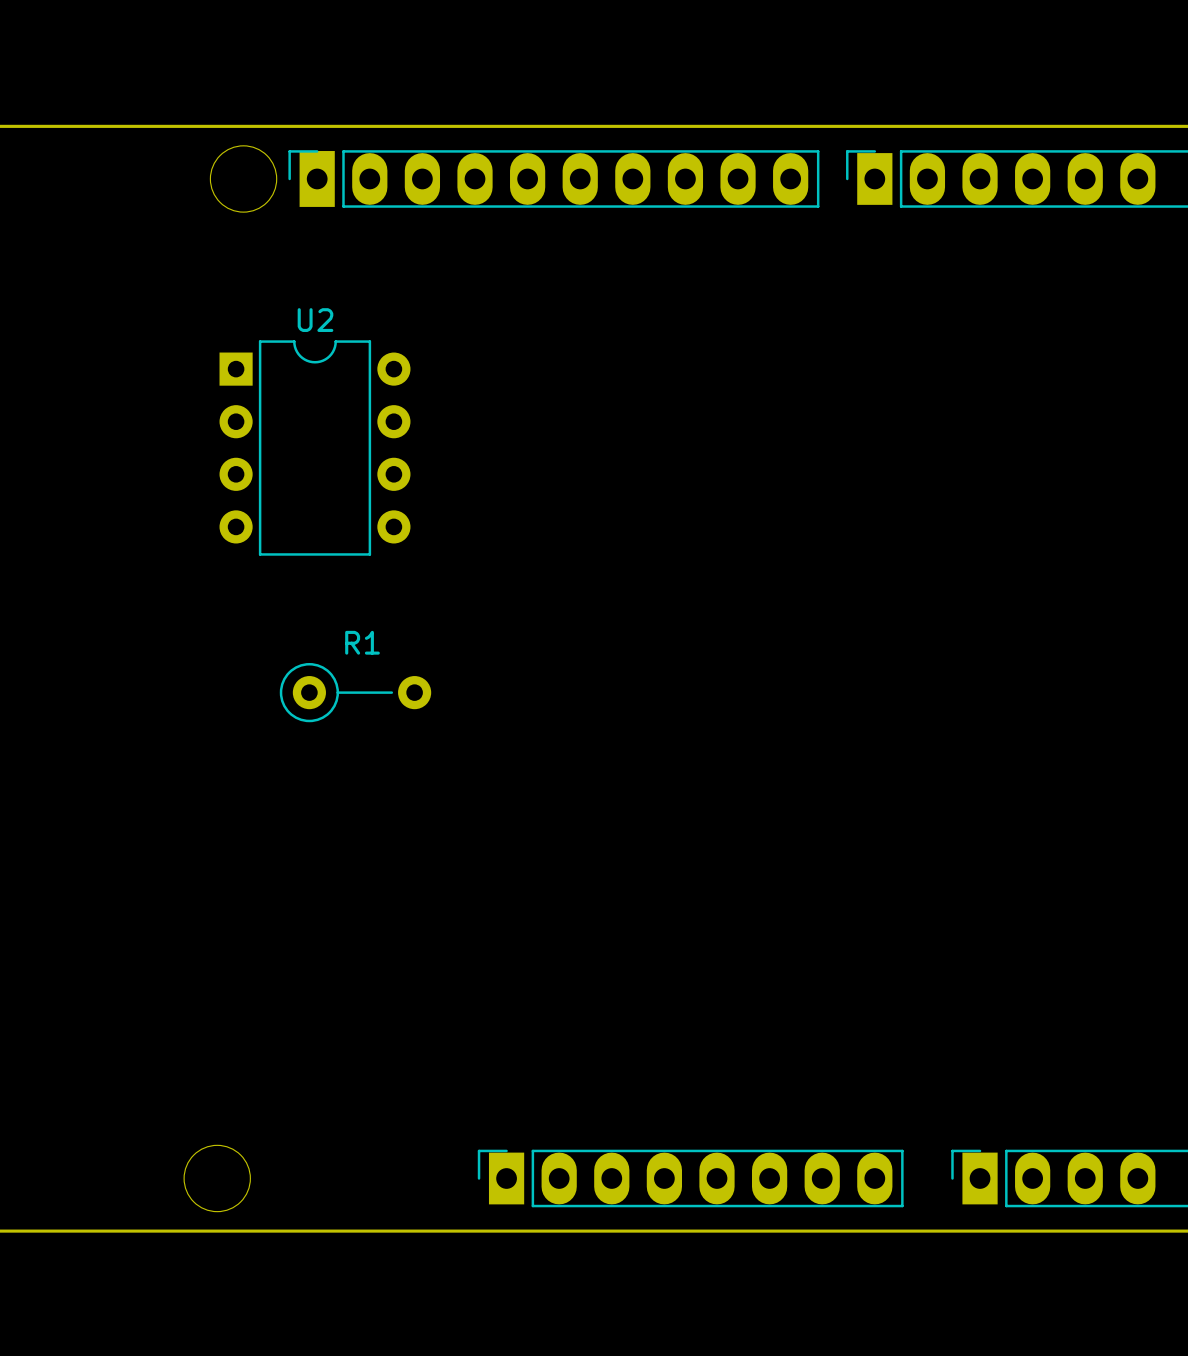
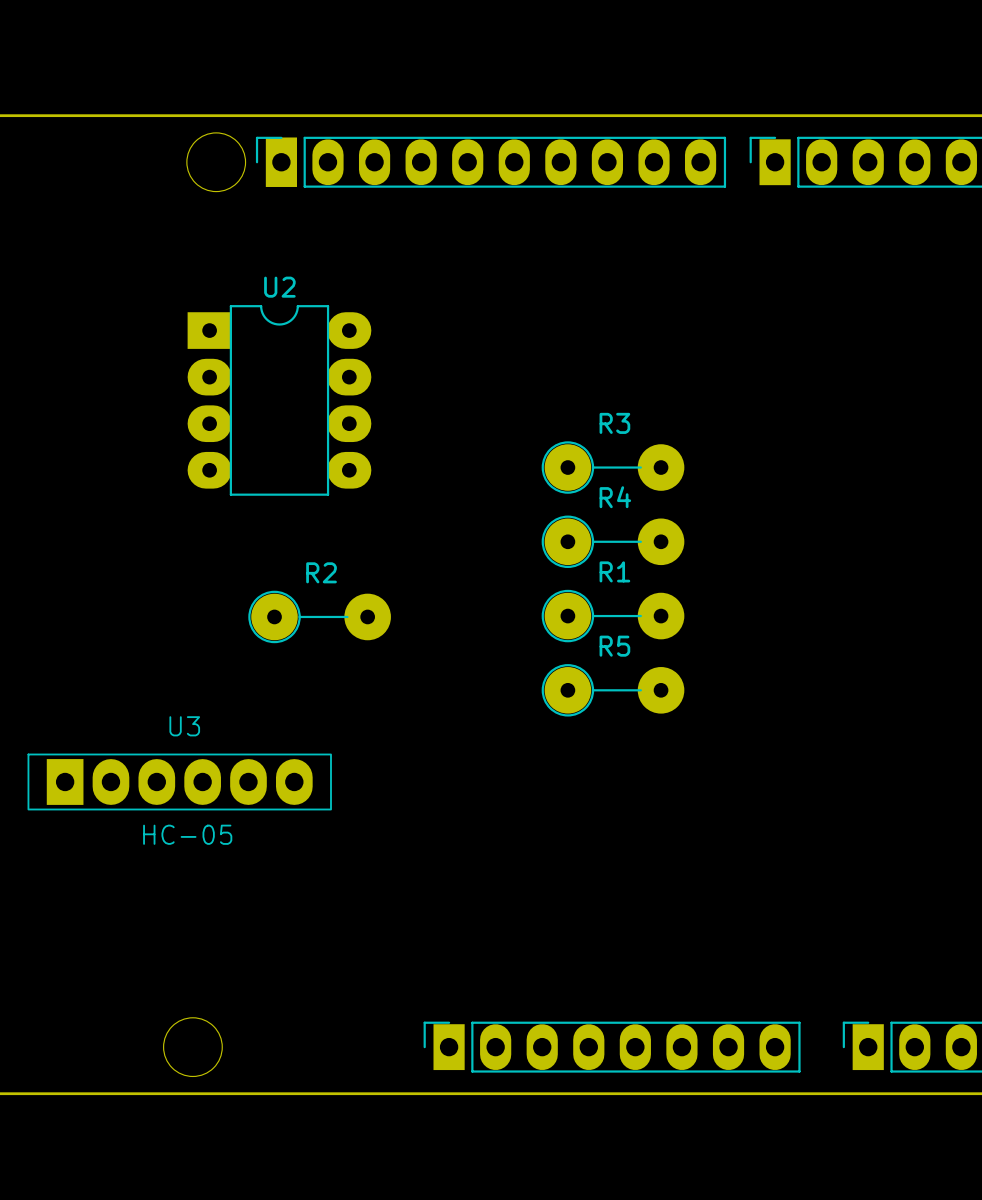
U2 footprint: [219, 340, 411, 556] -> [187, 305, 372, 496]
R3: none -> (613, 467)
R4: none -> (613, 541)
R1 footprint: [279, 662, 432, 723] -> [541, 589, 685, 643]
R2: none -> (319, 616)
R5: none -> (613, 690)
U3: none -> (179, 781)

